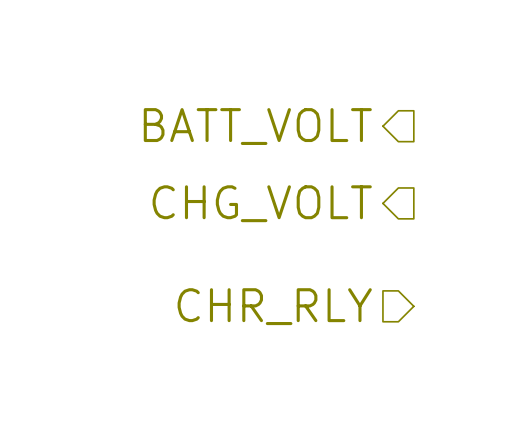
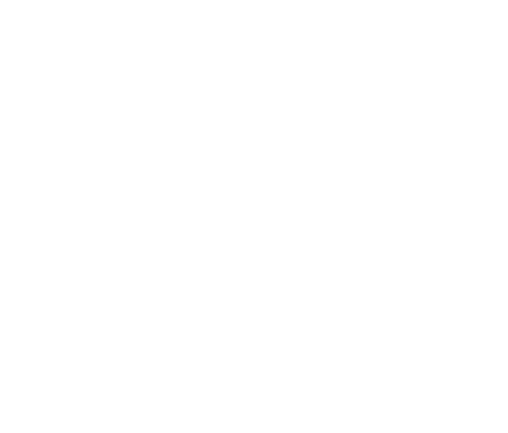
hierarchical label: BATT_VOLT (257, 126) -> none
hierarchical label: CHG_VOLT (262, 203) -> none
hierarchical label: CHR_RLY (274, 306) -> none

